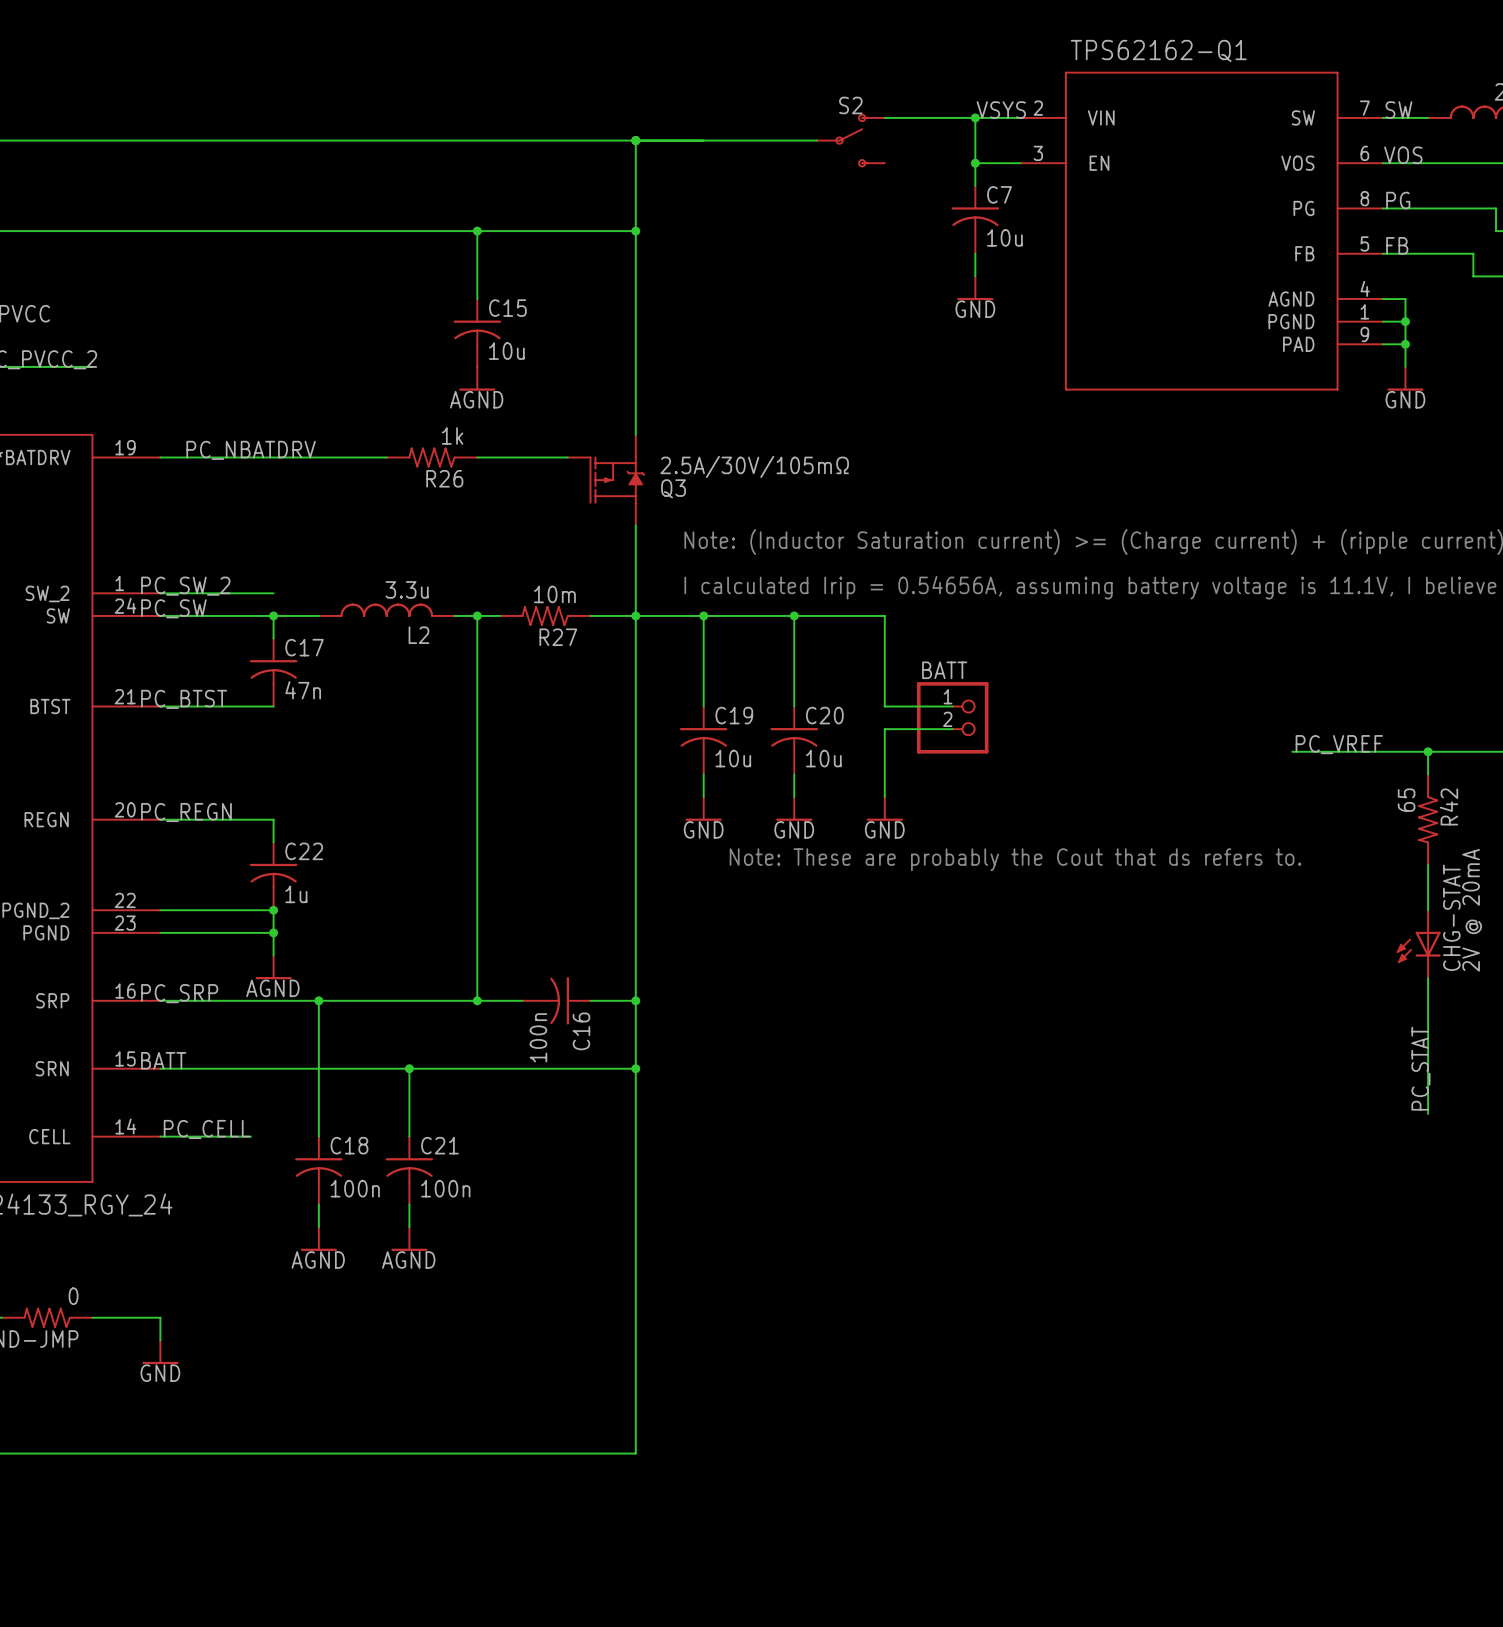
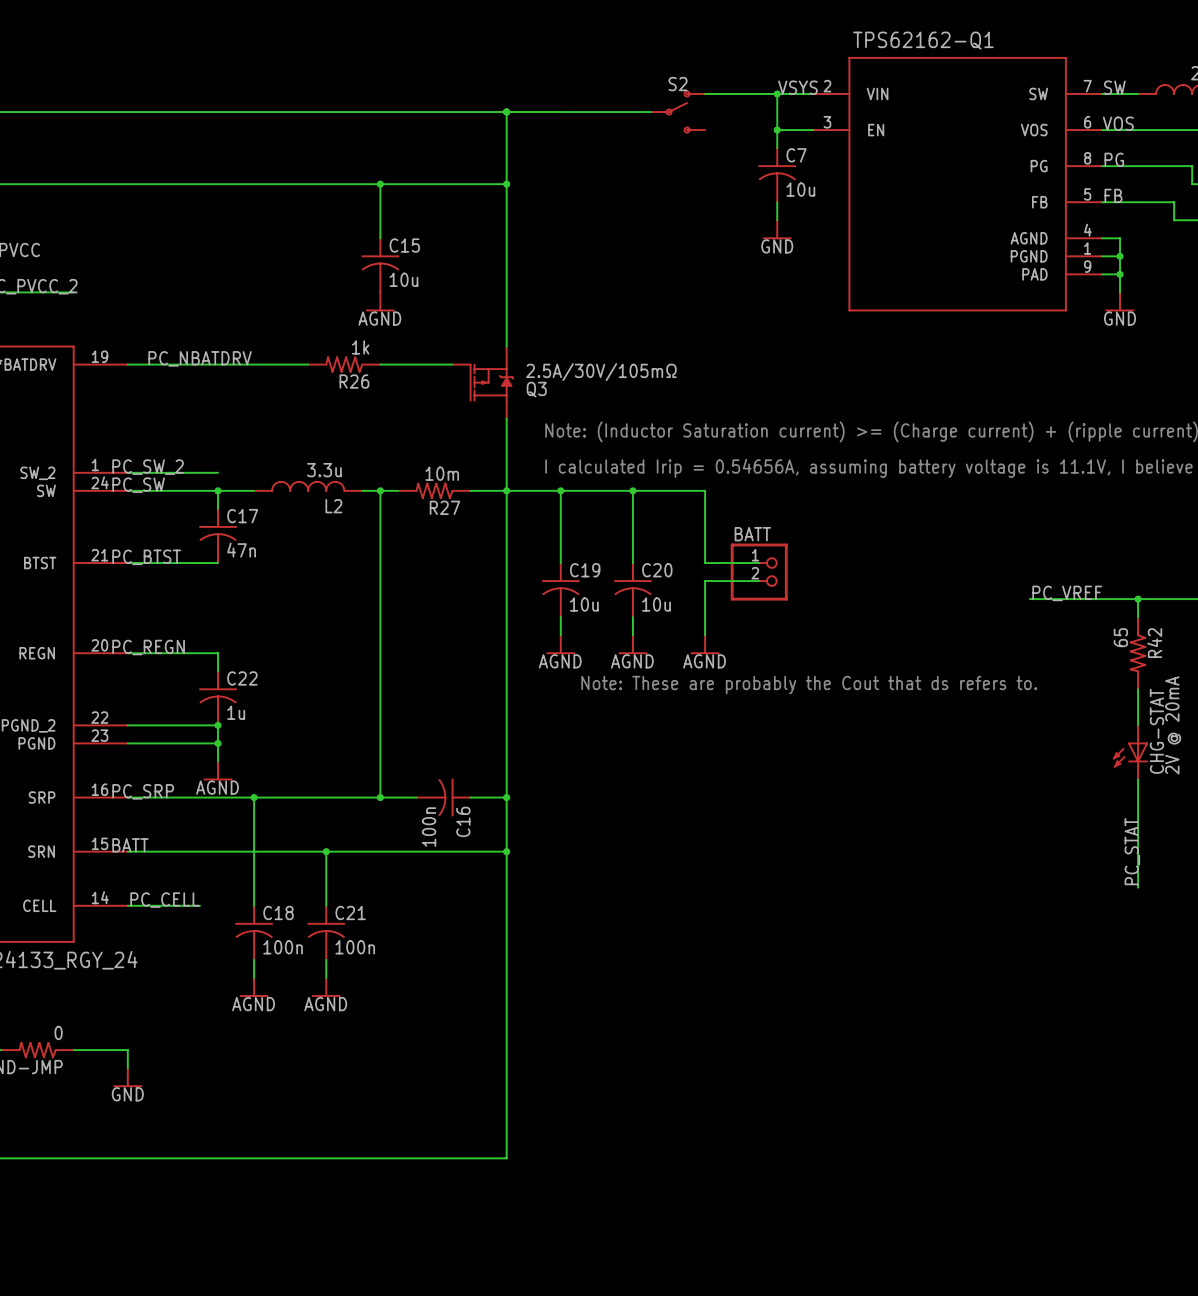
power symbol: GND (703, 808) -> AGND (560, 644)
power symbol: GND (794, 808) -> AGND (632, 644)
power symbol: GND (884, 808) -> AGND (705, 644)

